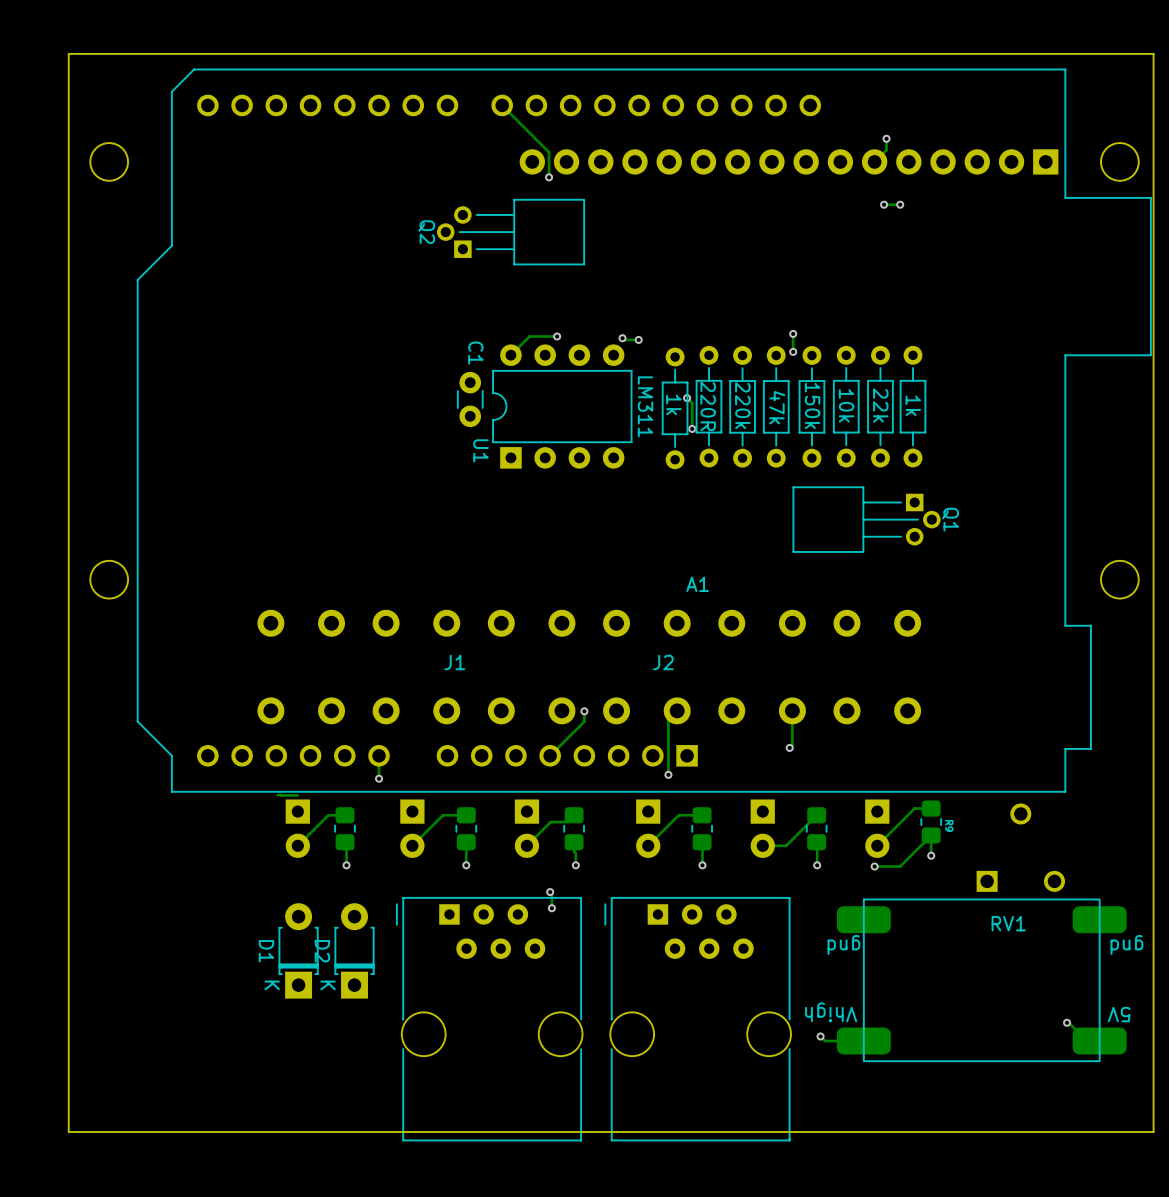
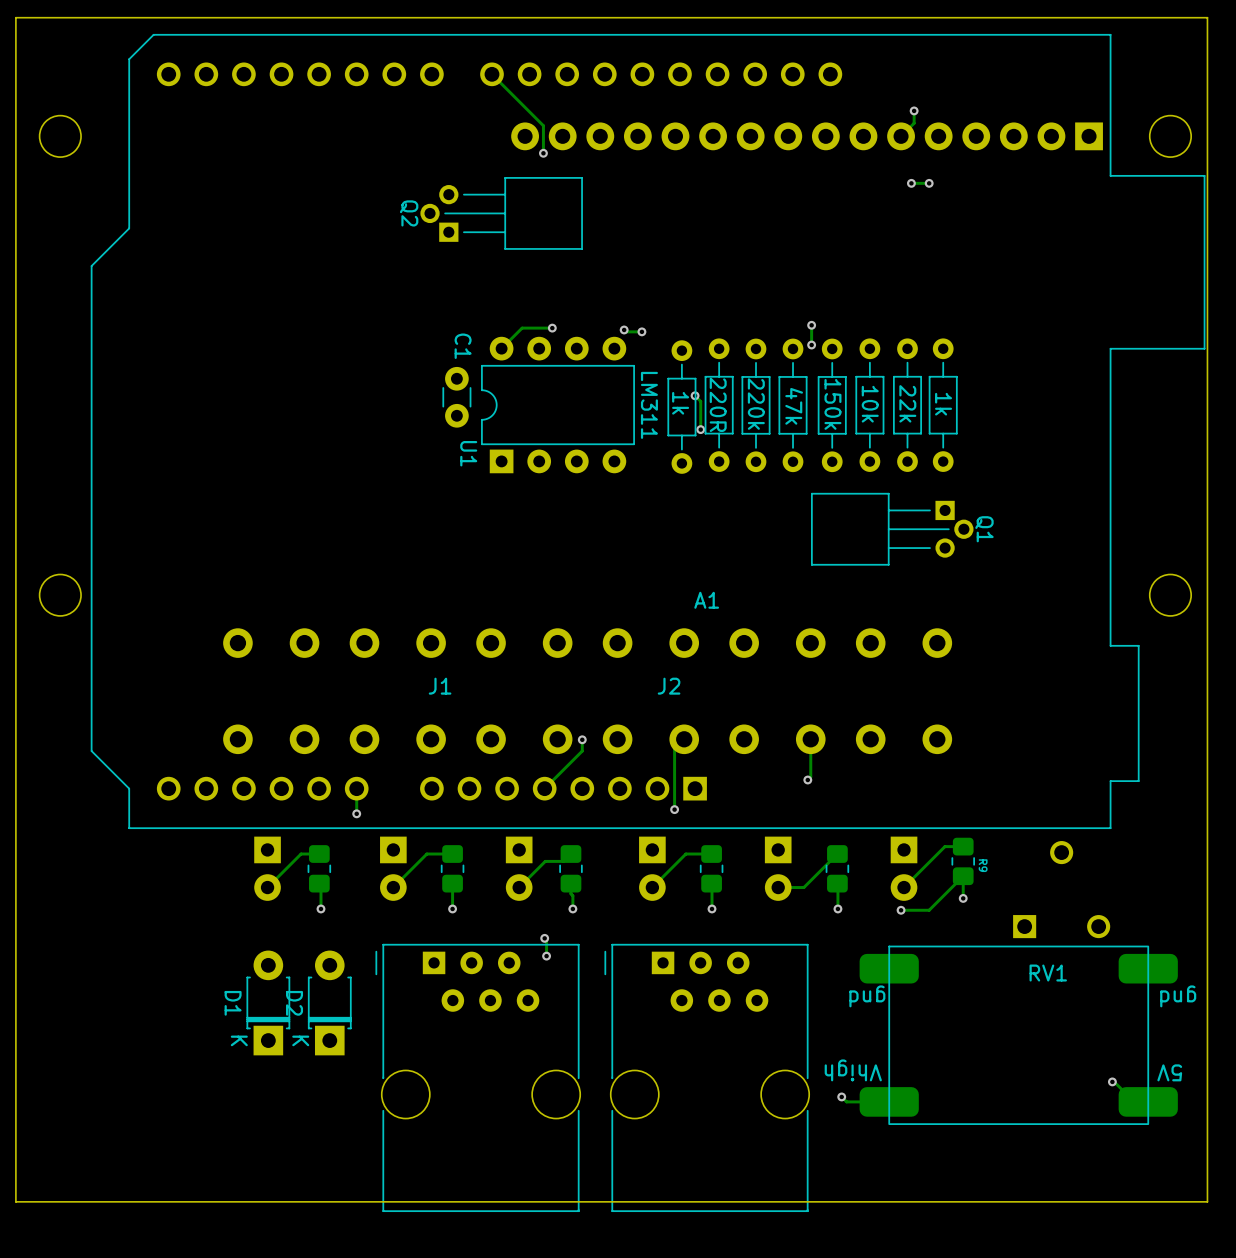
track: (277, 795) (297, 795) -> none

